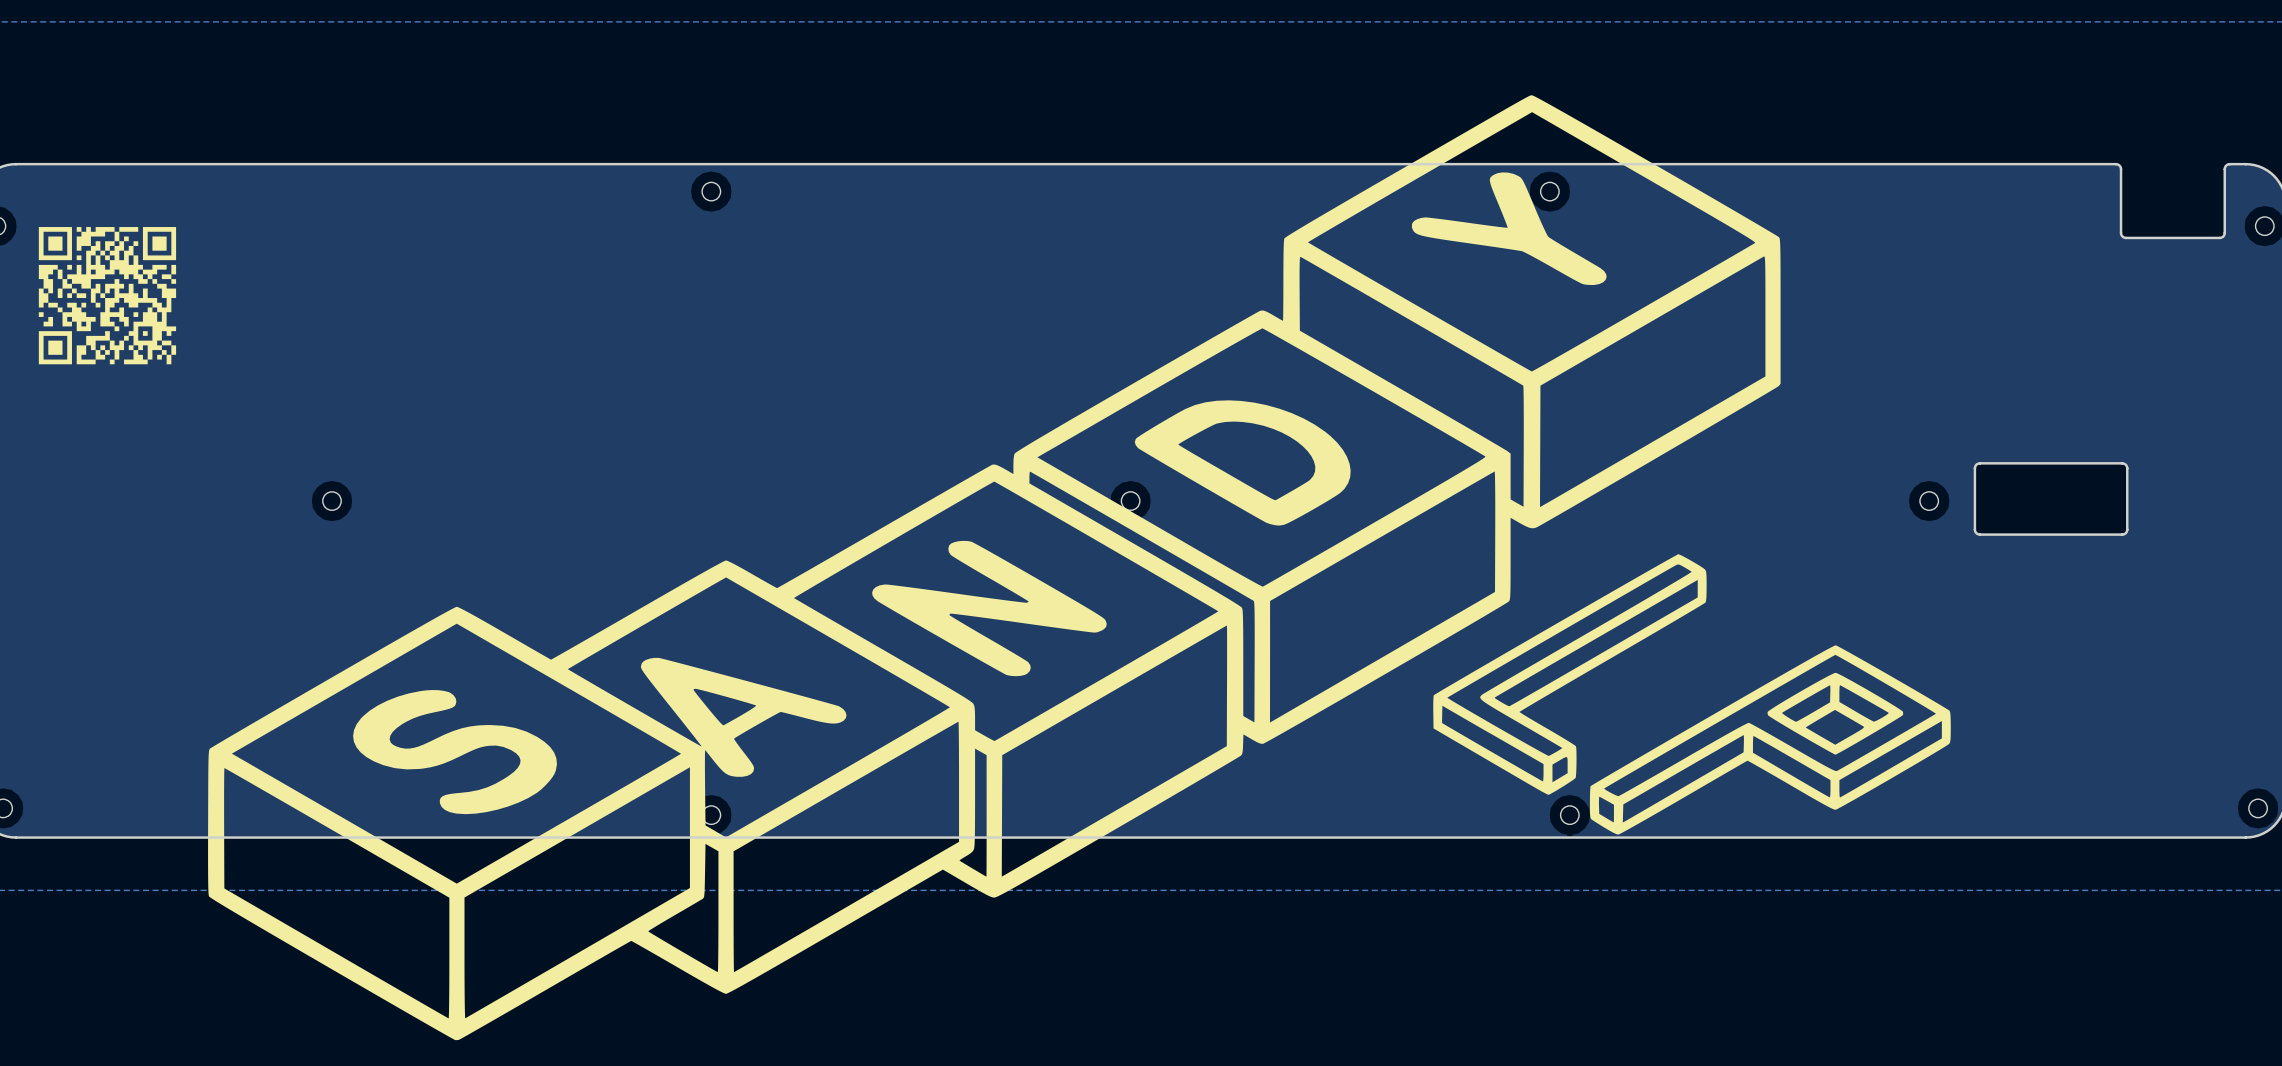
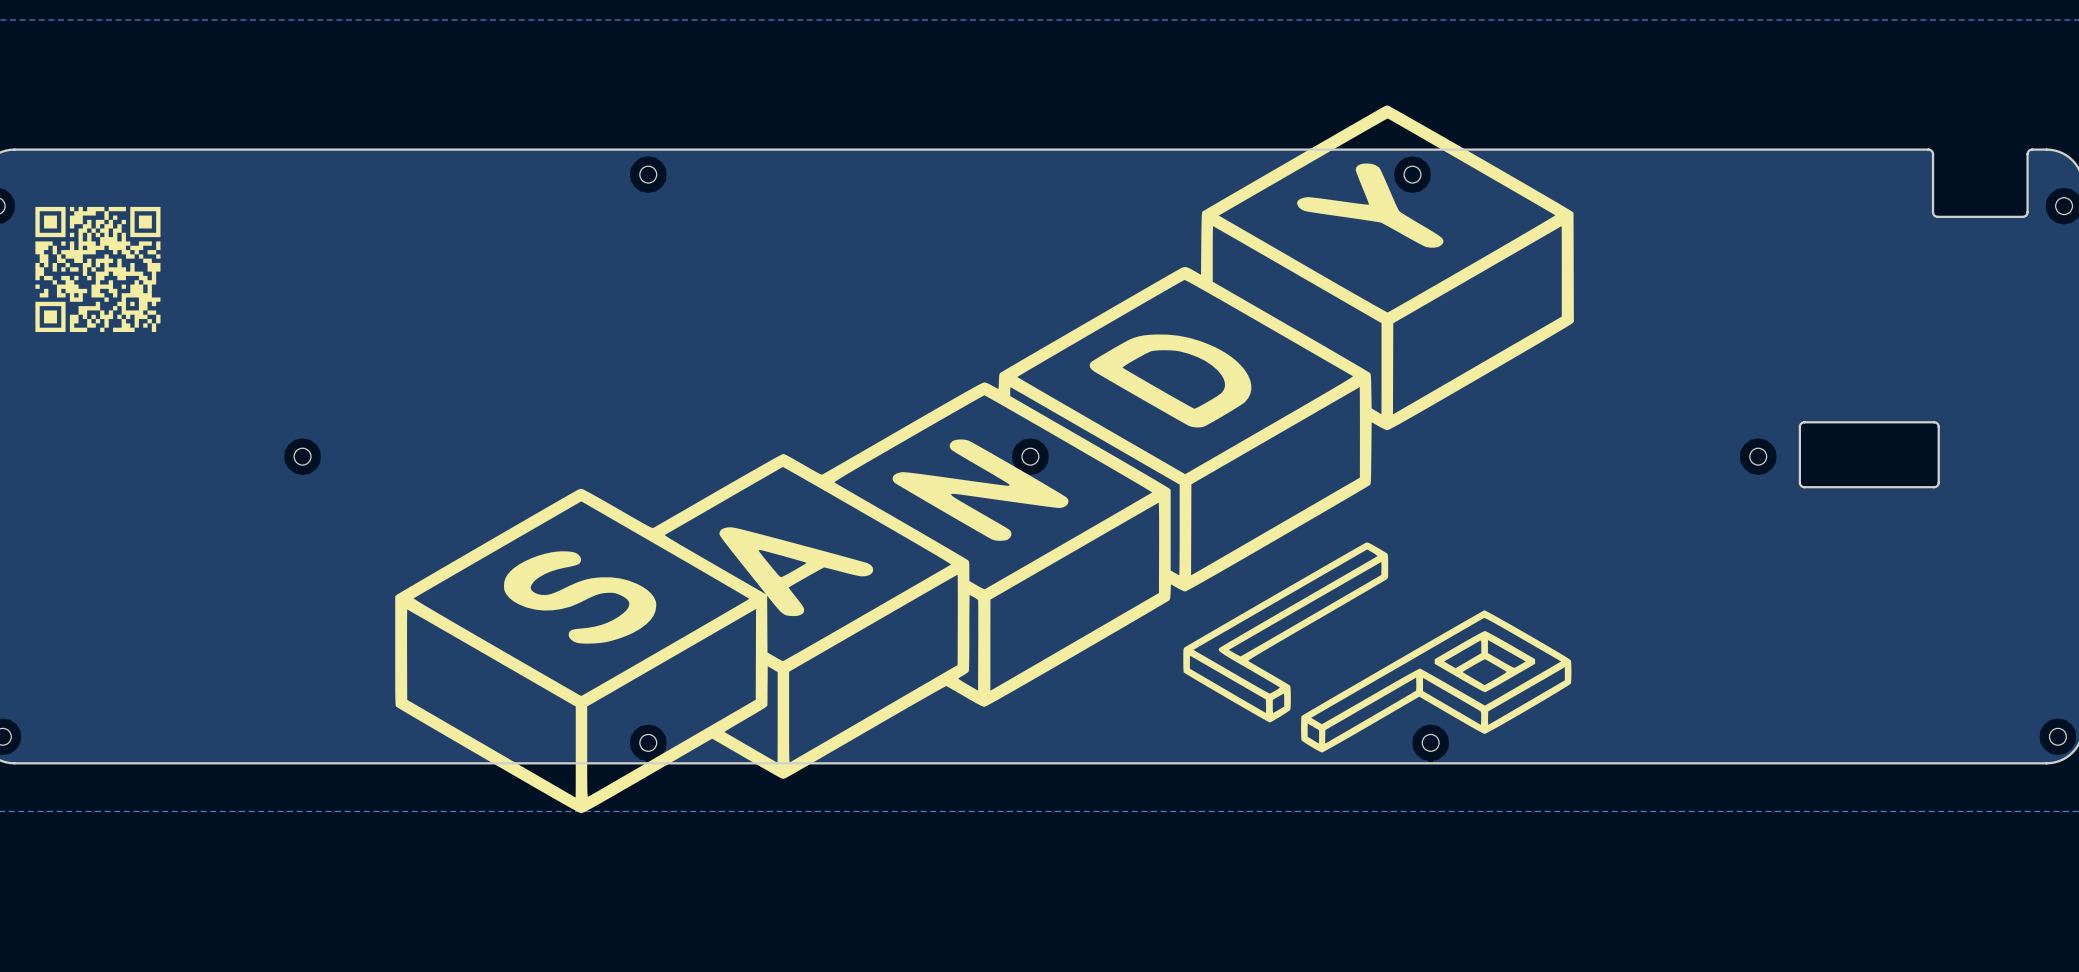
drawing: [208, 95, 1951, 1041] -> none
drawing: none -> [395, 105, 1574, 814]

